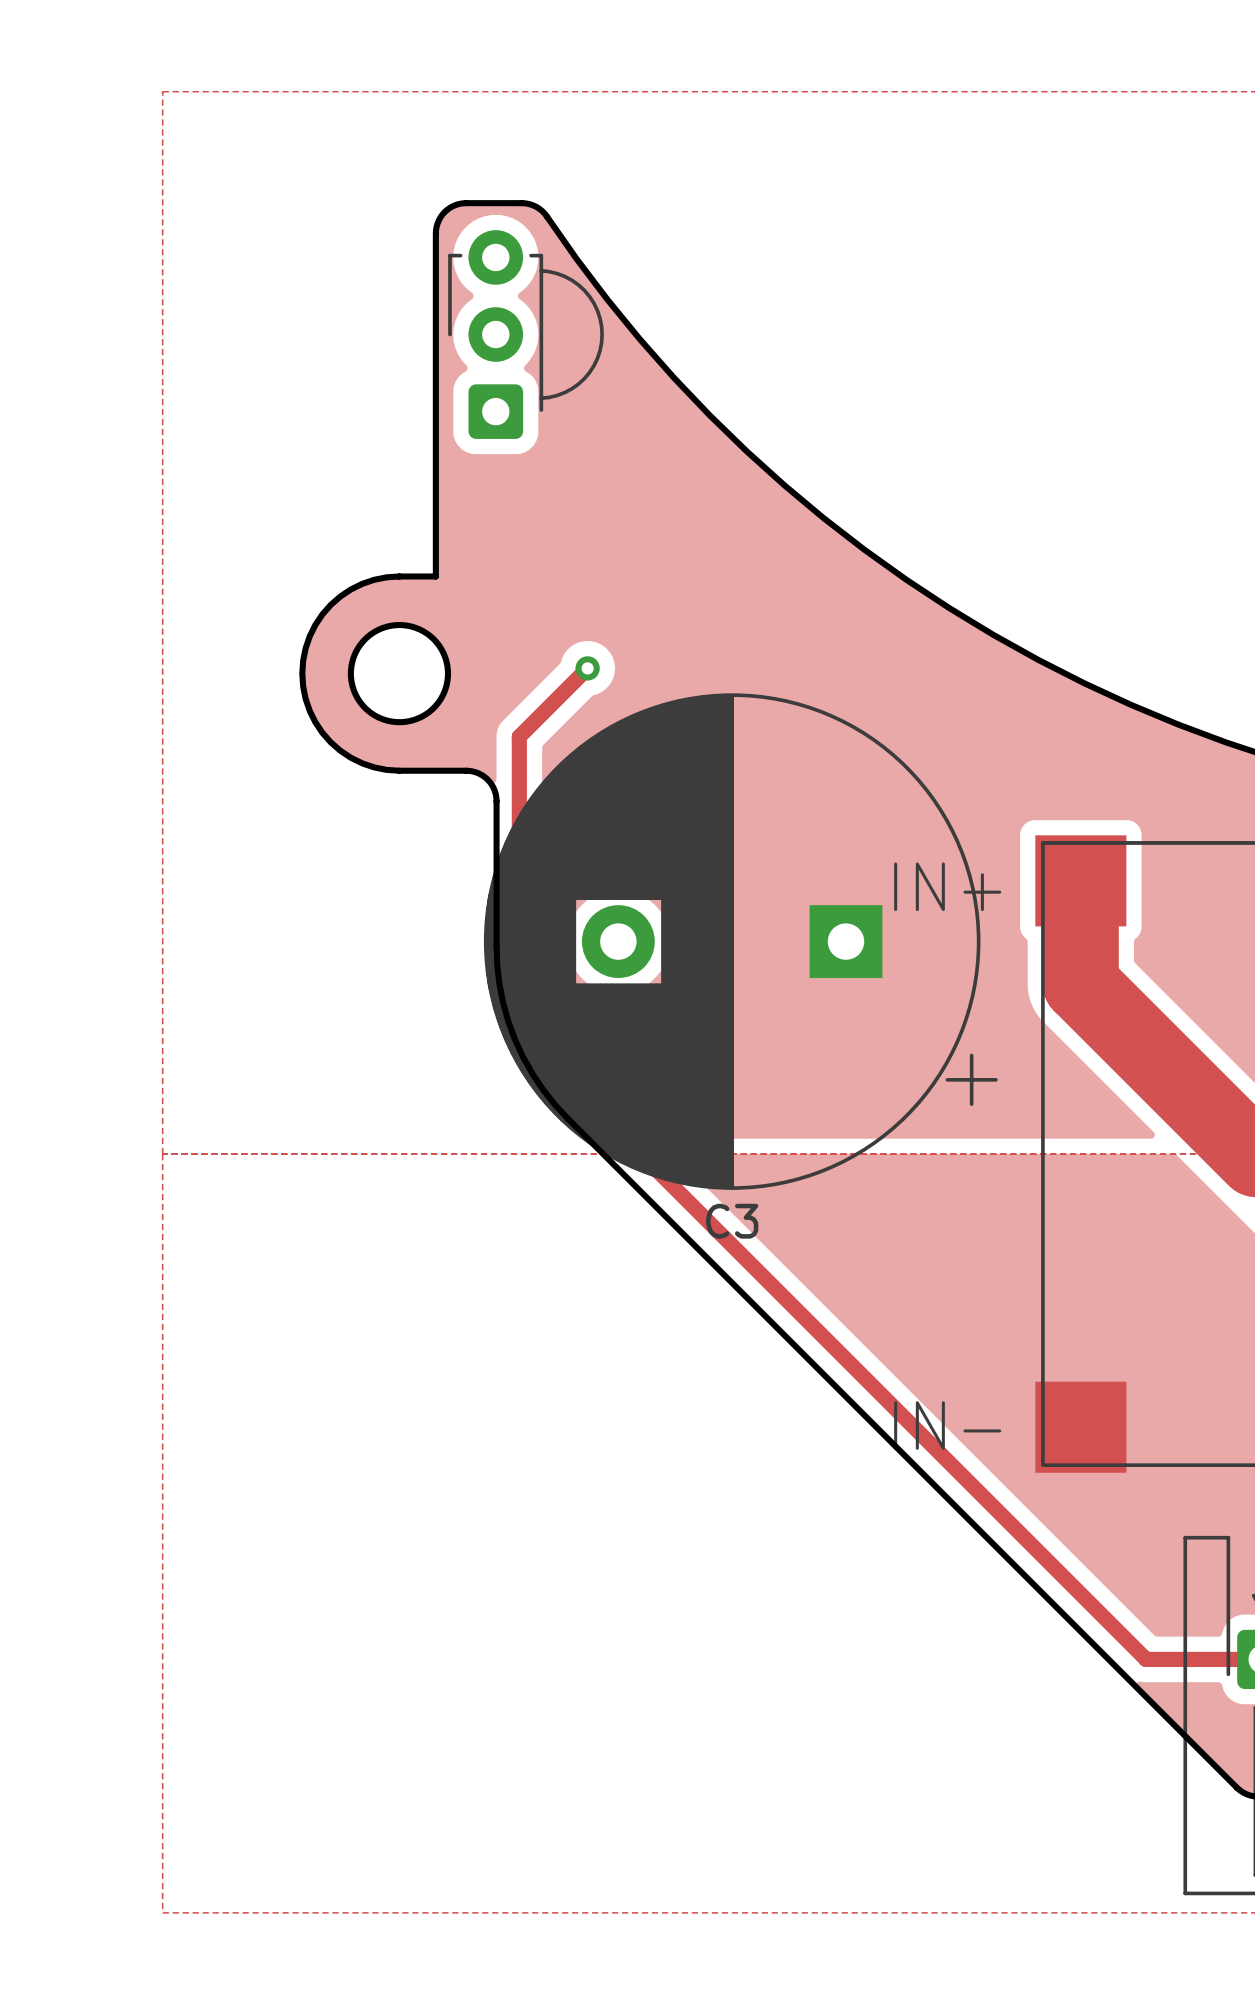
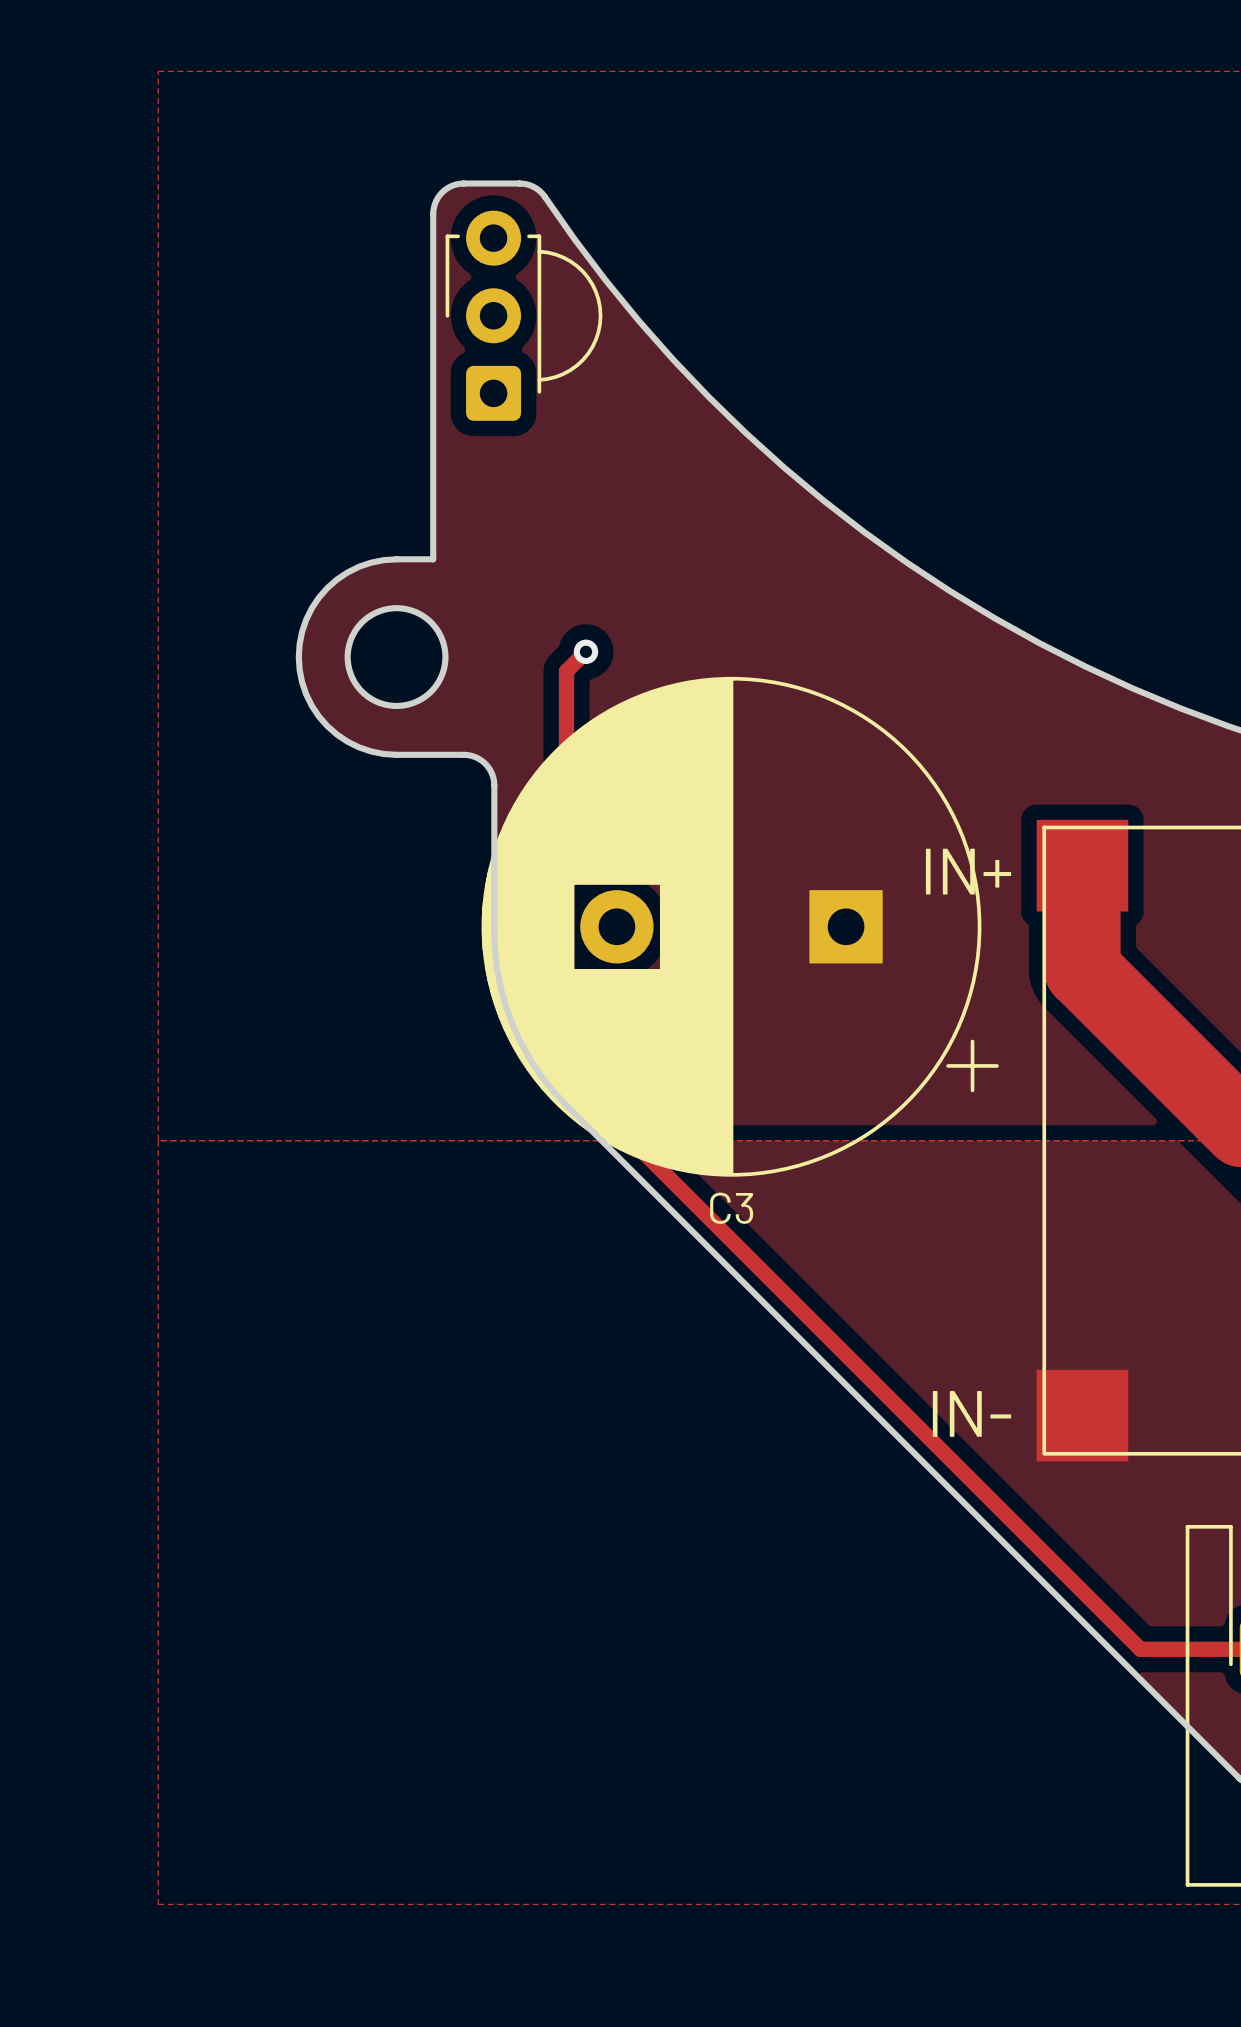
track: (568, 687) (519, 736) (519, 994) (542, 1017) (542, 1055) (1146, 1659) -> (566, 671) (566, 1075) (1140, 1649) (1148, 1649)

